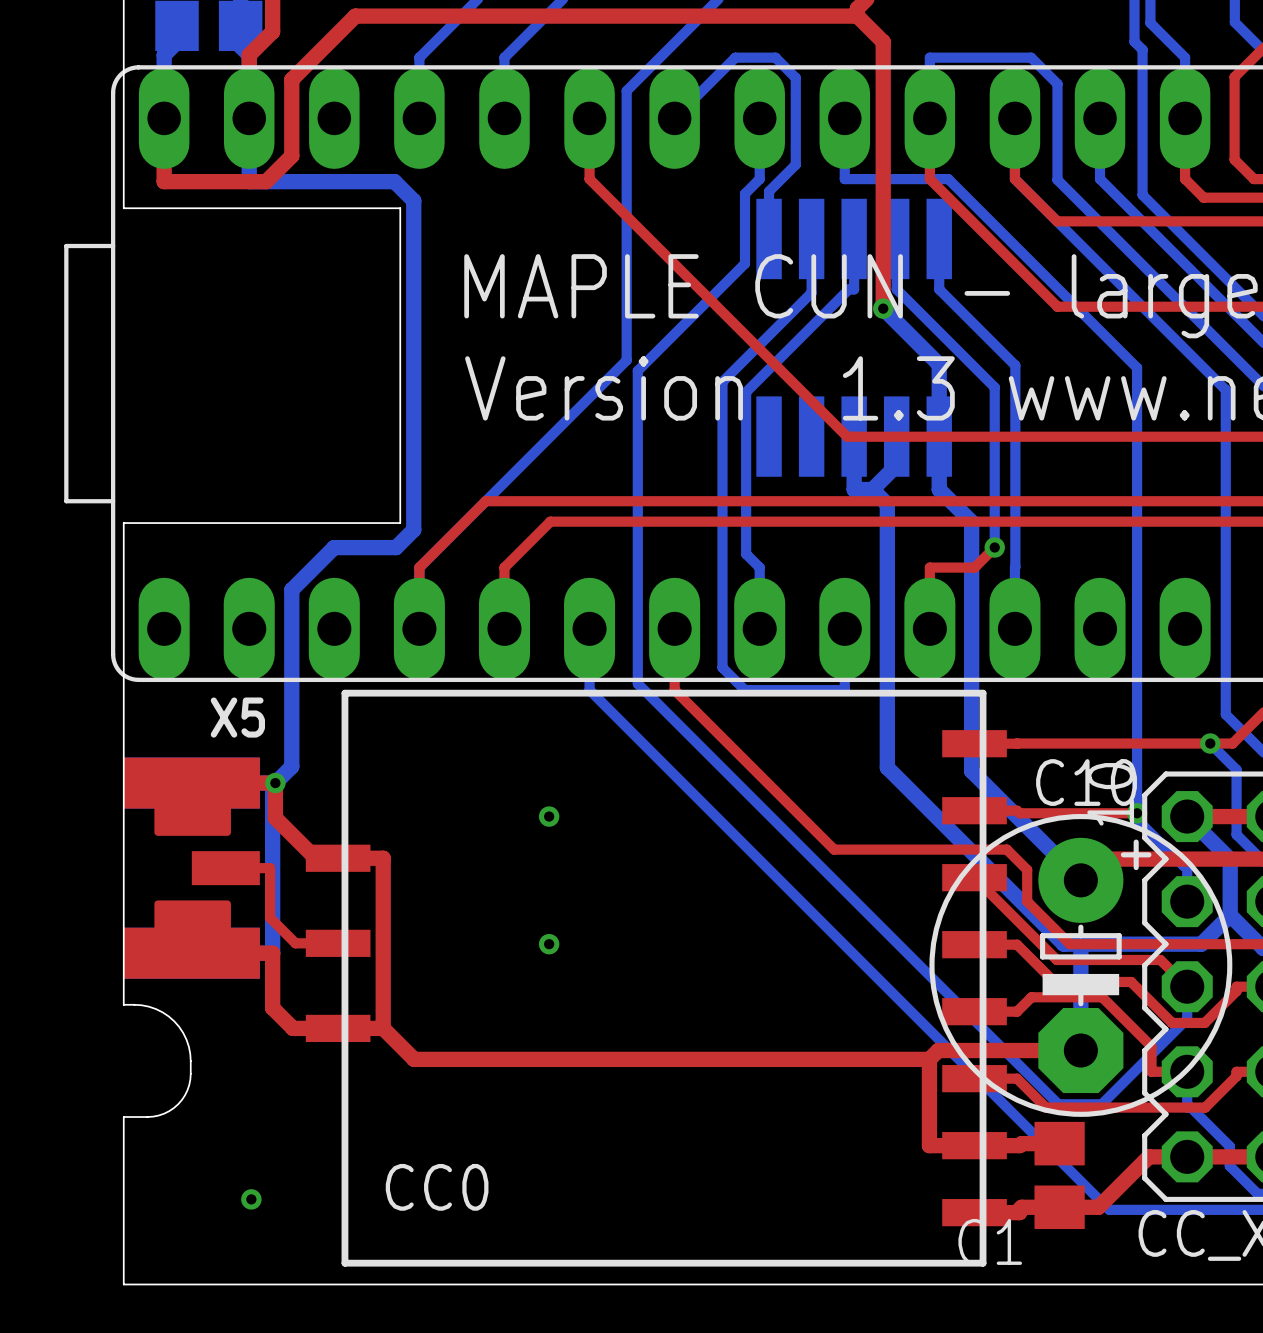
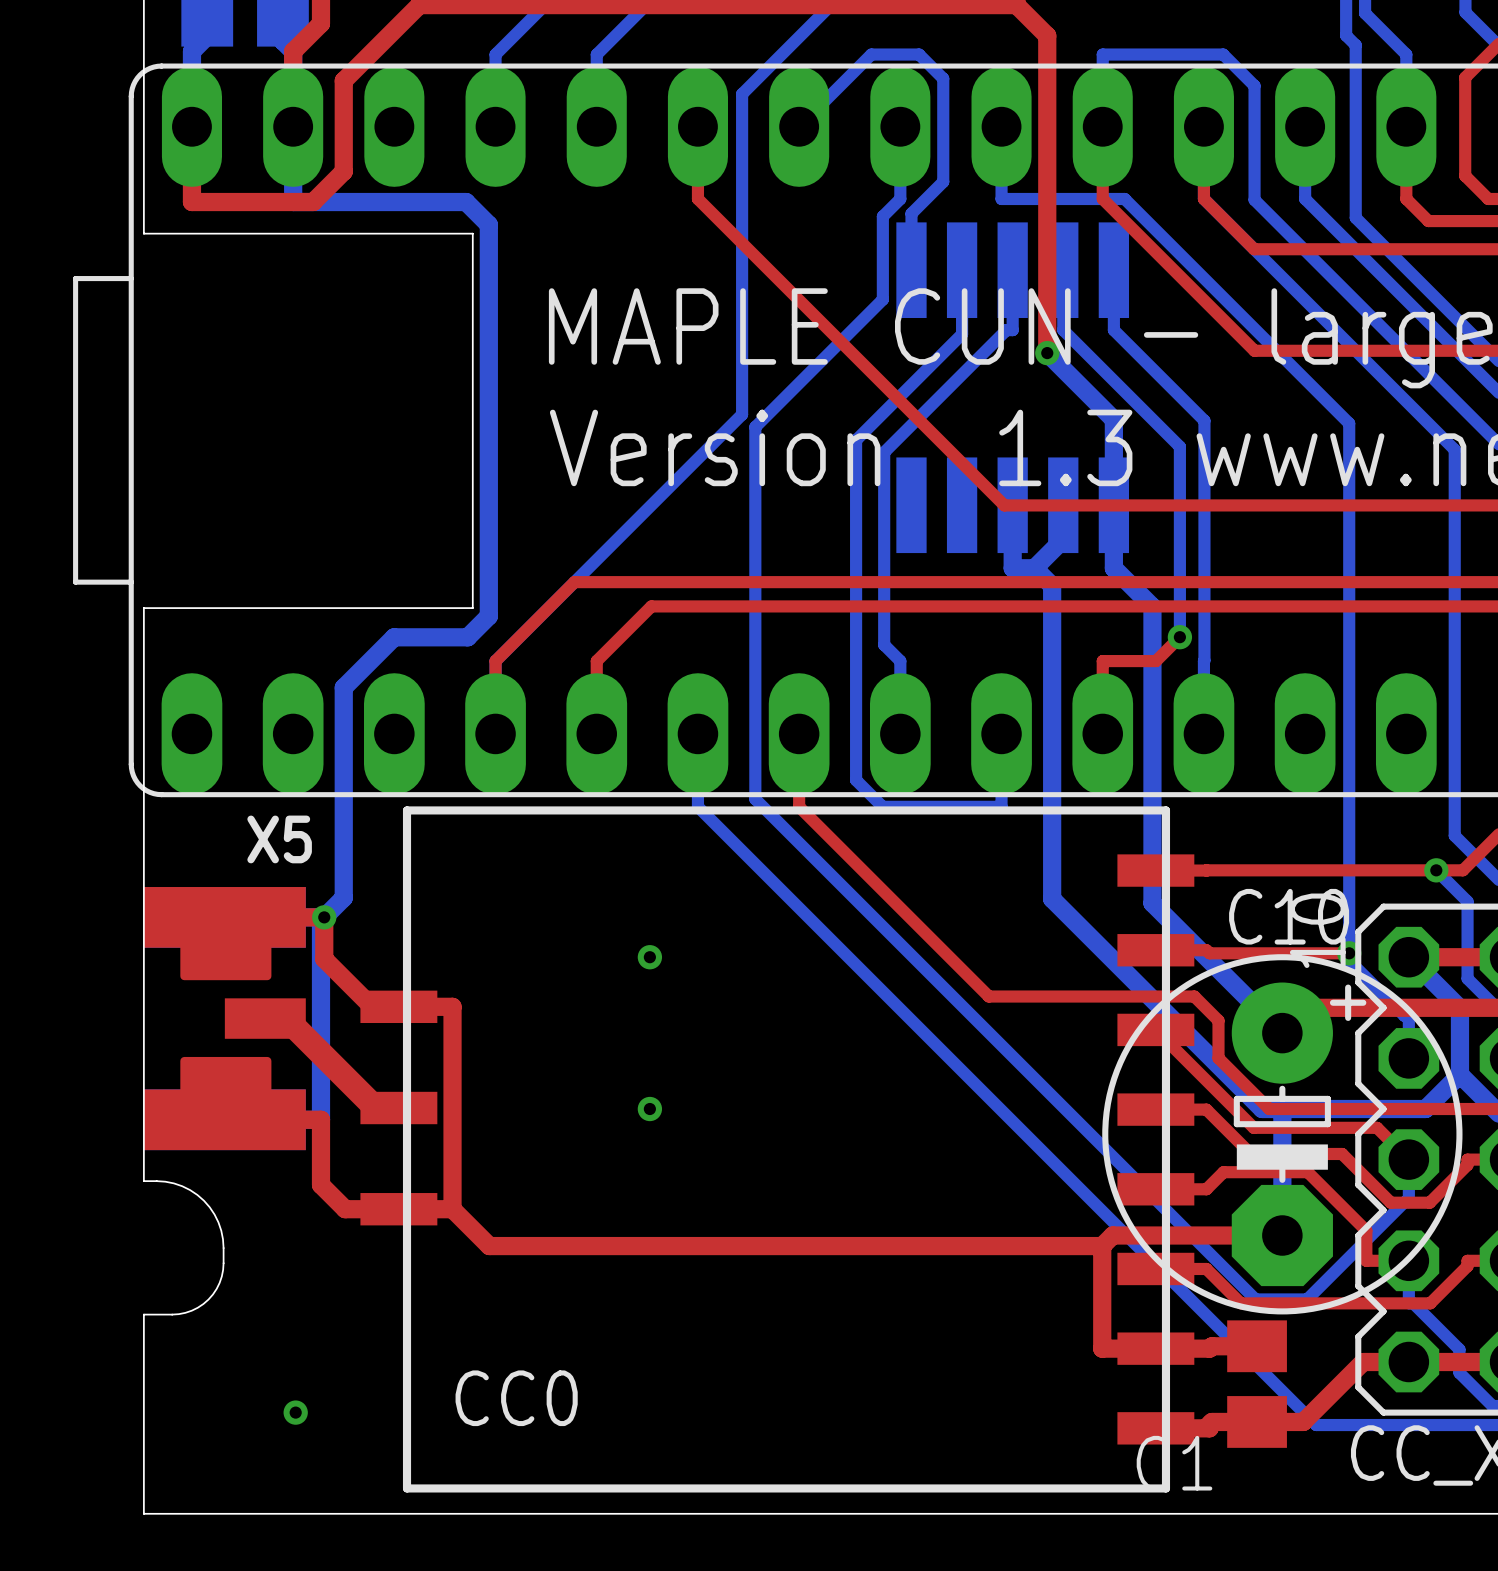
top track: (225, 868) (270, 868) (270, 917) (295, 943) (318, 943) -> (265, 1018) (285, 1017) (375, 1108)

